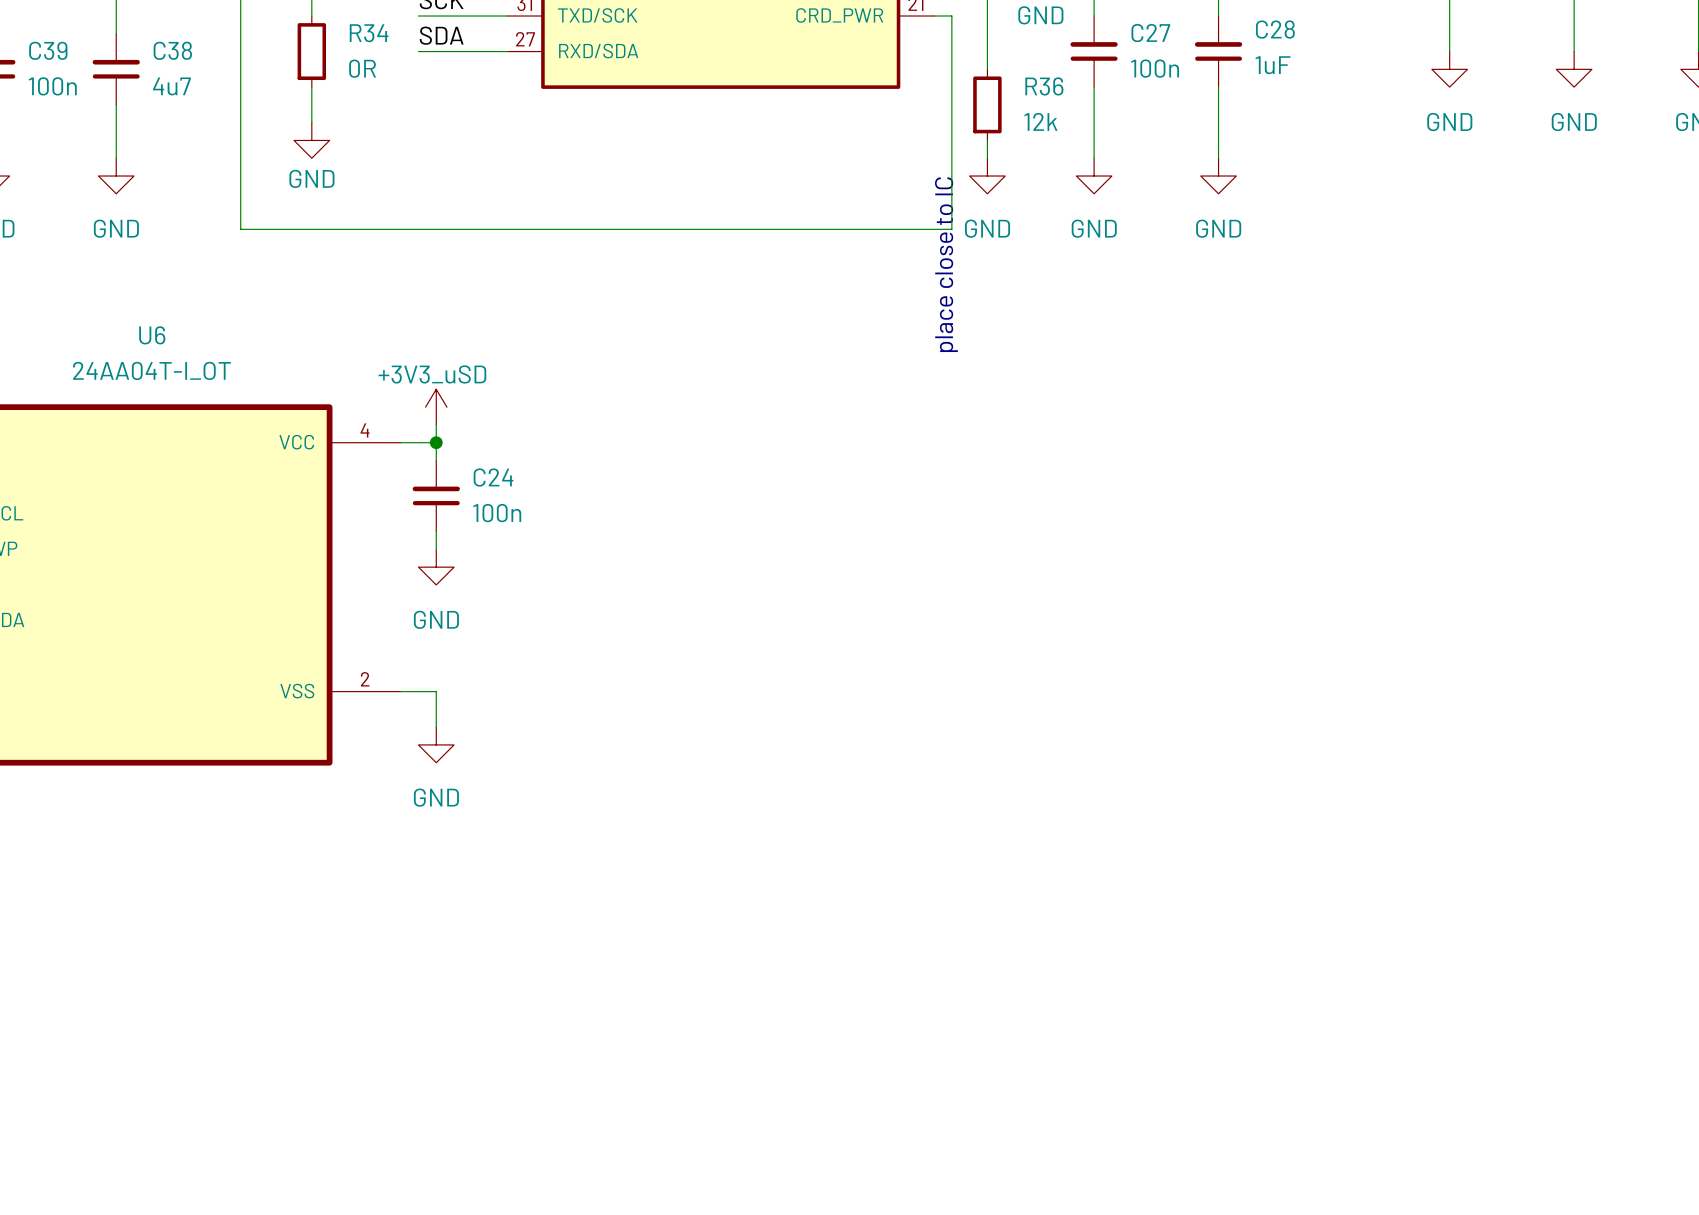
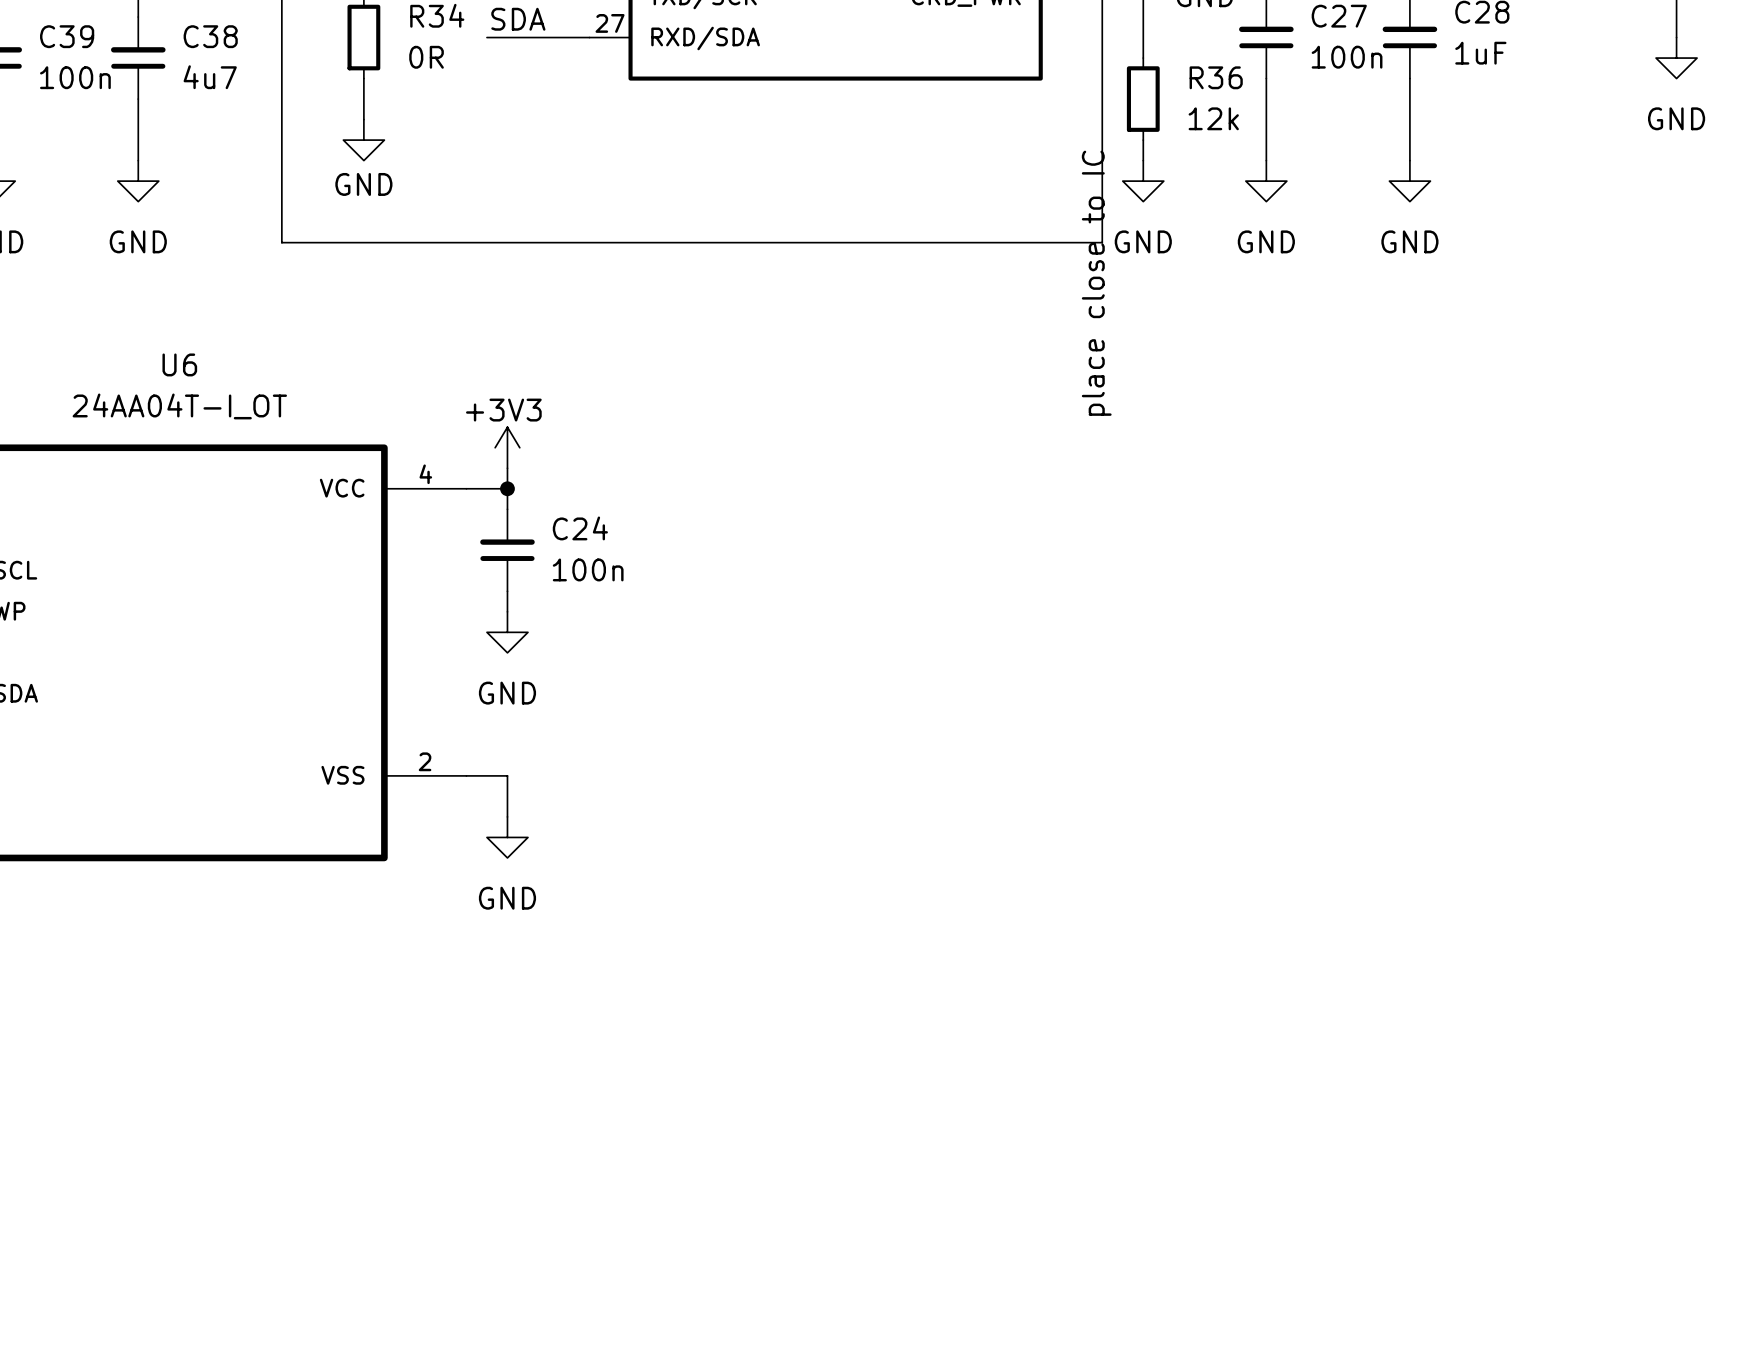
power symbol: +3V3_uSD (436, 407) -> +3V3 (507, 447)

